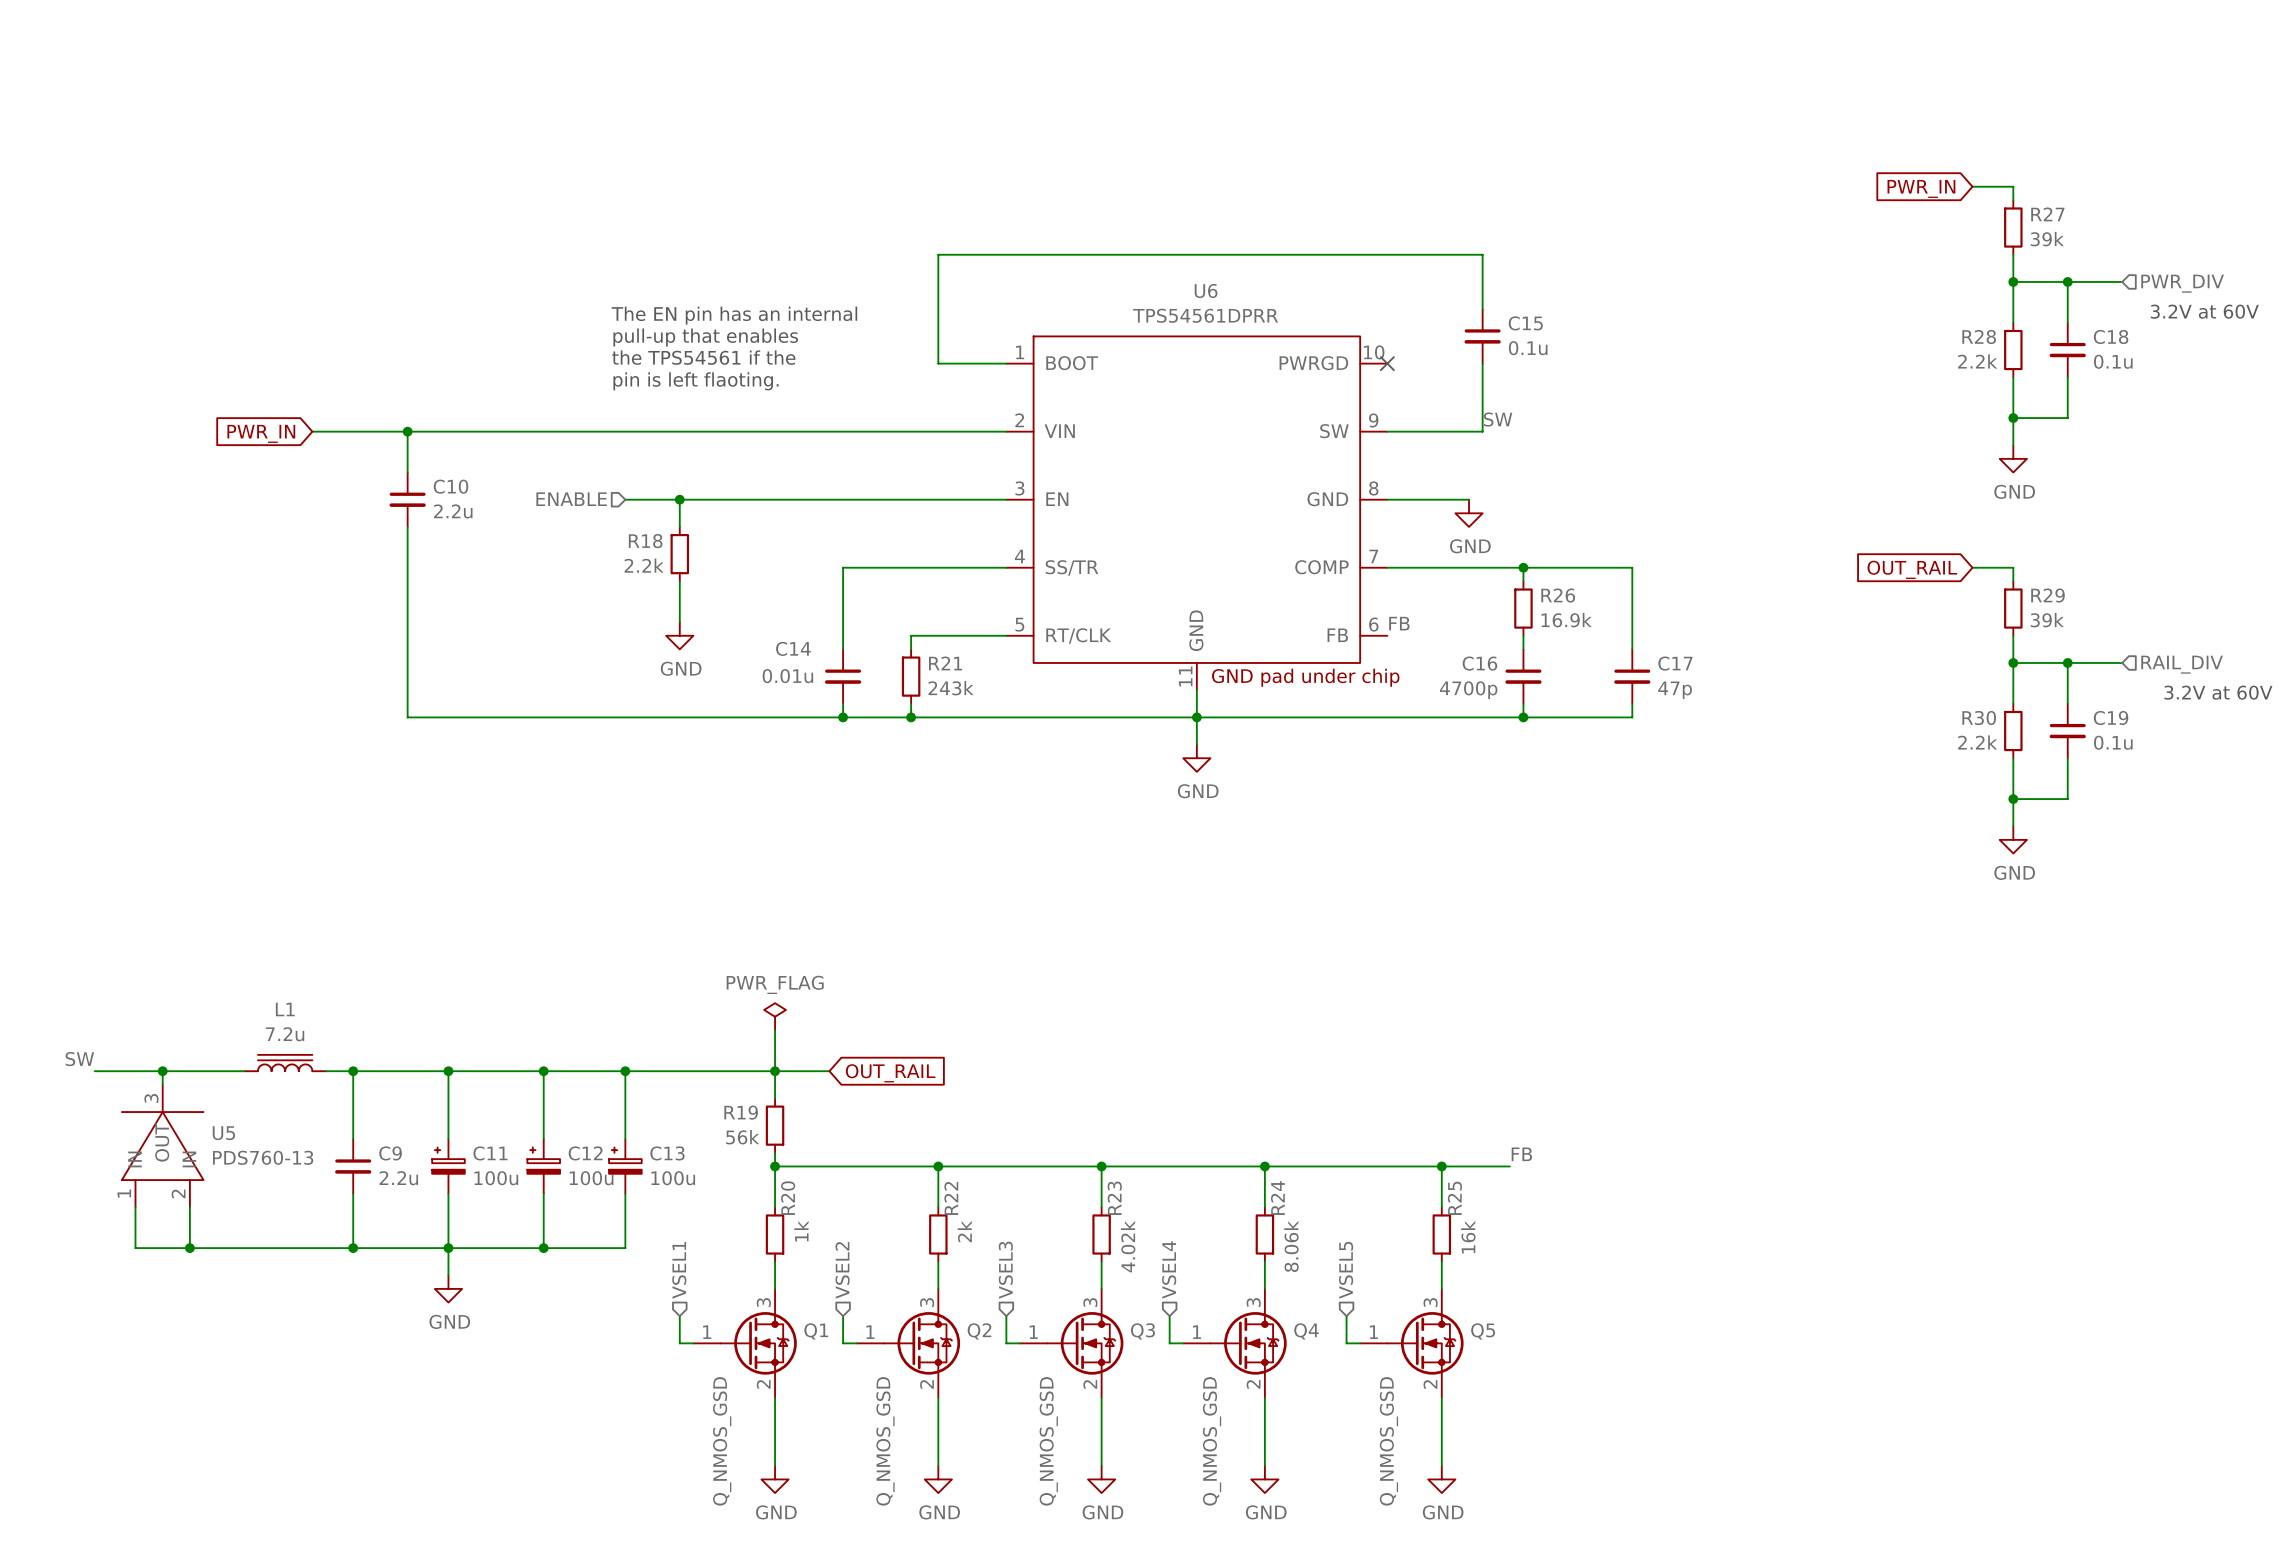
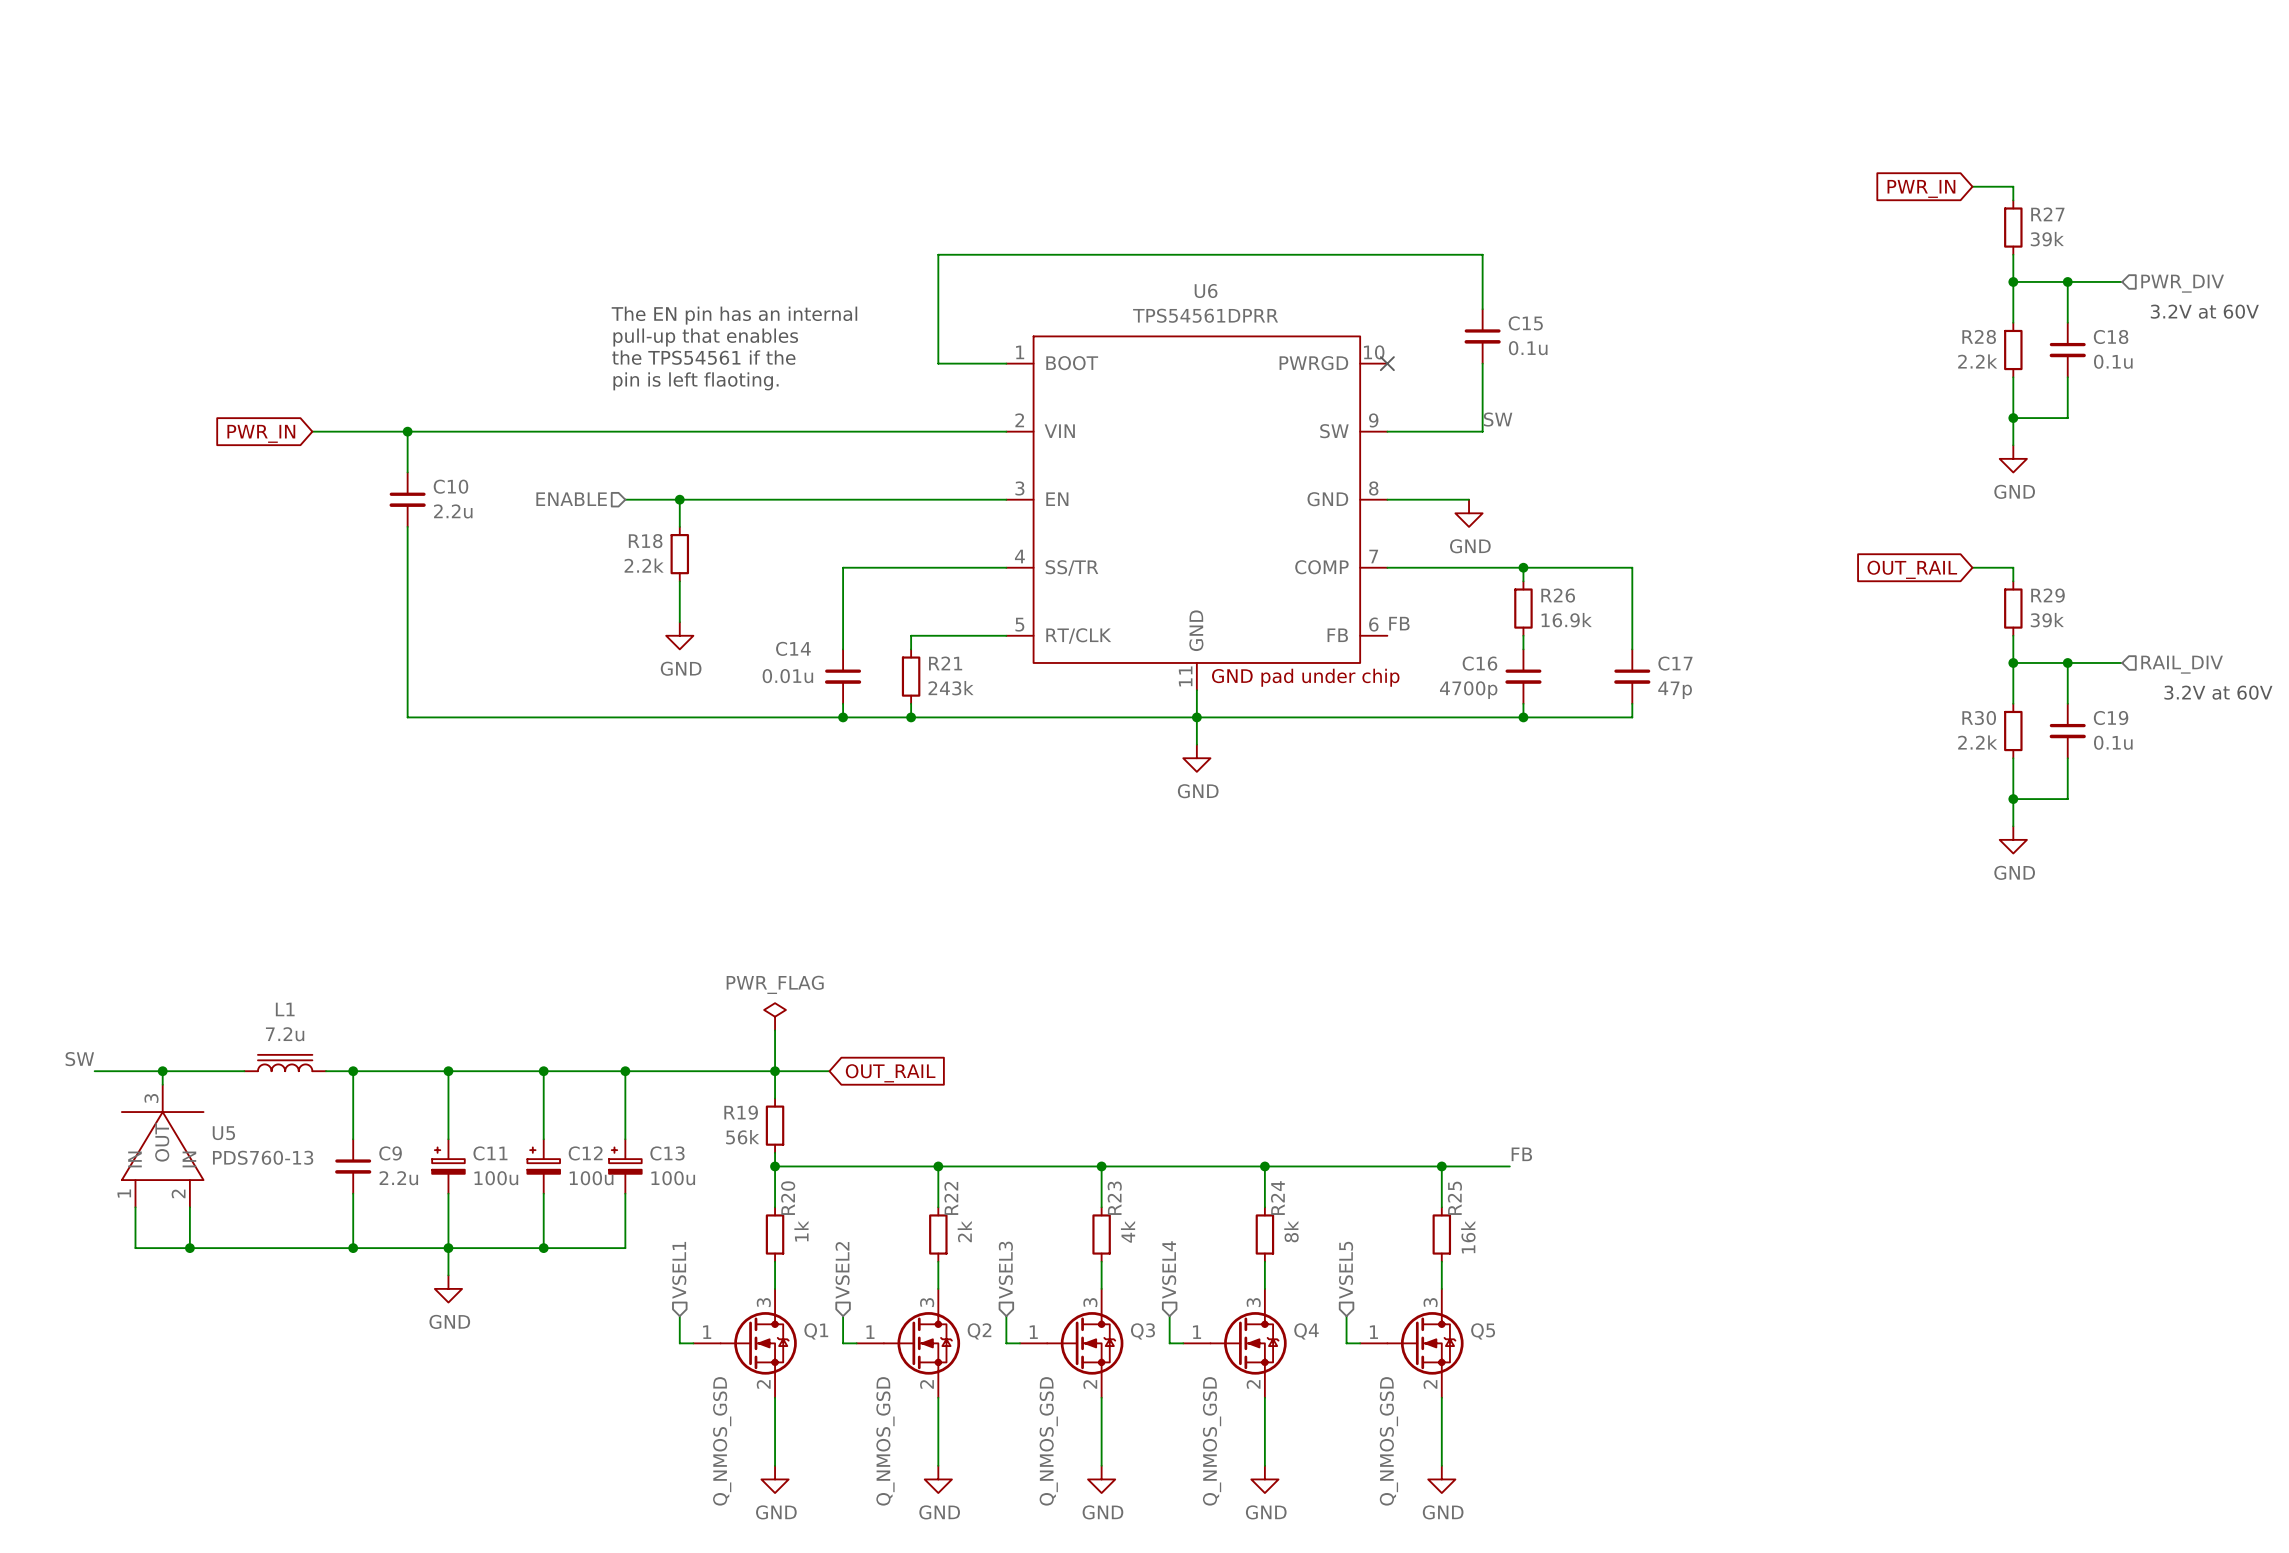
R23 value: 4.02k (1128, 1246) -> 4k (1128, 1231)
R24 value: 8.06k (1291, 1246) -> 8k (1291, 1231)

